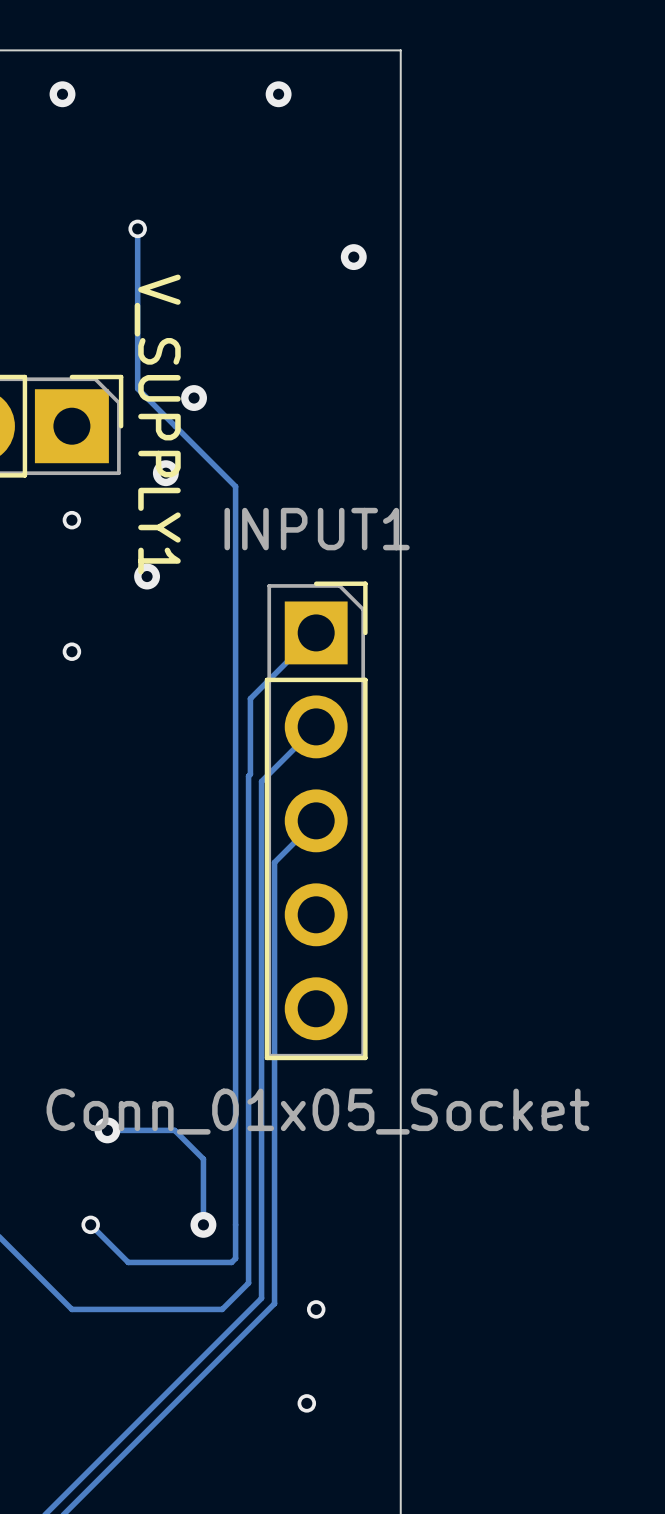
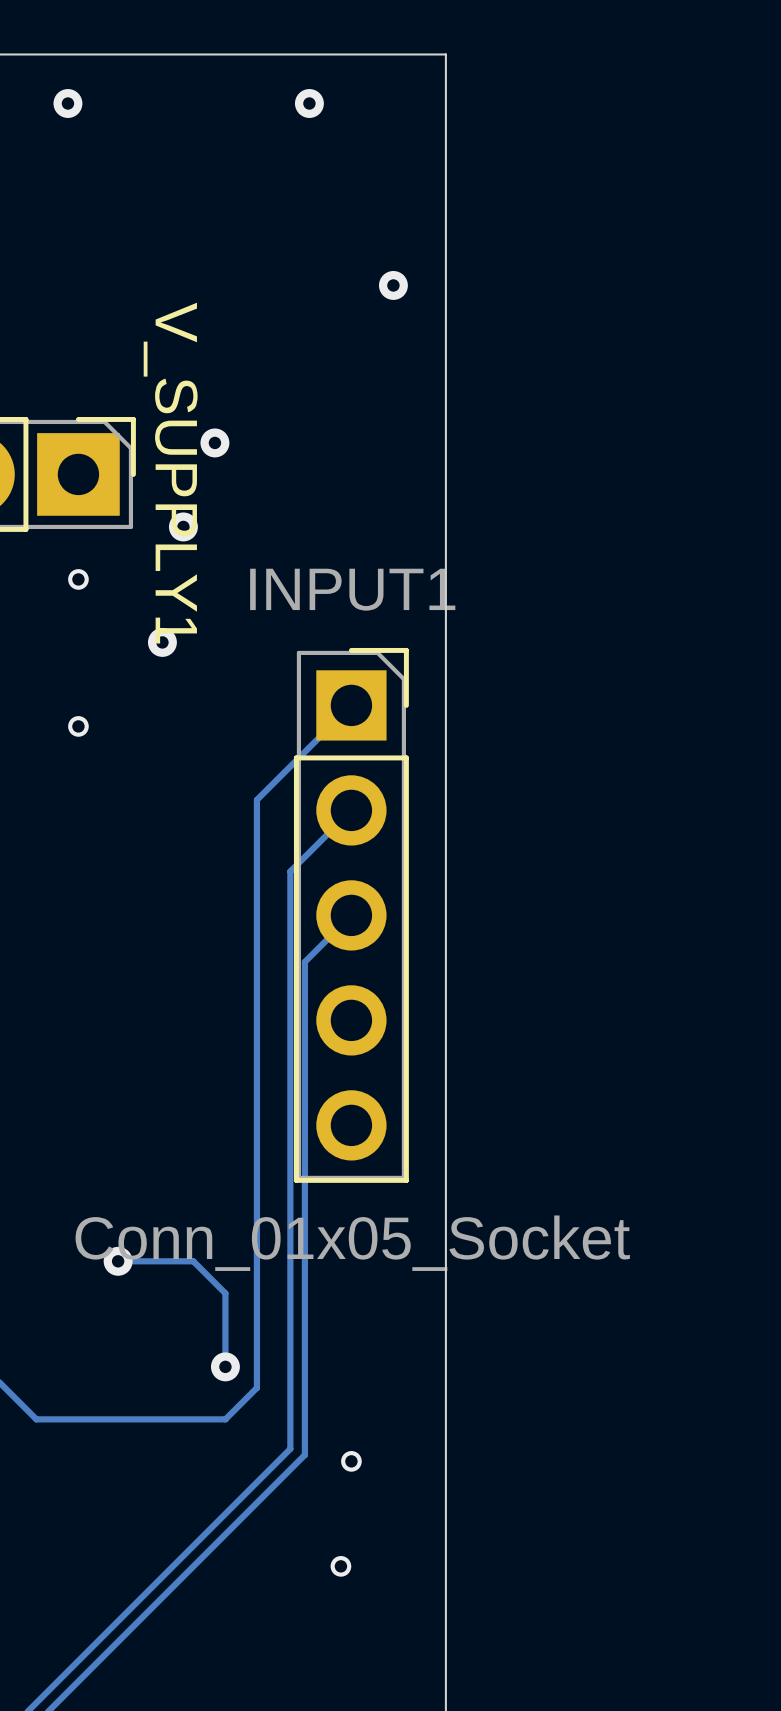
track: (137, 228) (137, 388) (235, 486) (235, 1258) (231, 1262) (128, 1262) (90, 1224) -> none
via: (137, 228) -> none
track: (250, 698) (250, 774) (248, 776) (248, 1283) (222, 1309) (71, 1309) (34, 1271) -> (277, 778) (256, 799) (256, 1387) (225, 1419) (36, 1419)
via: (90, 1224) -> none

